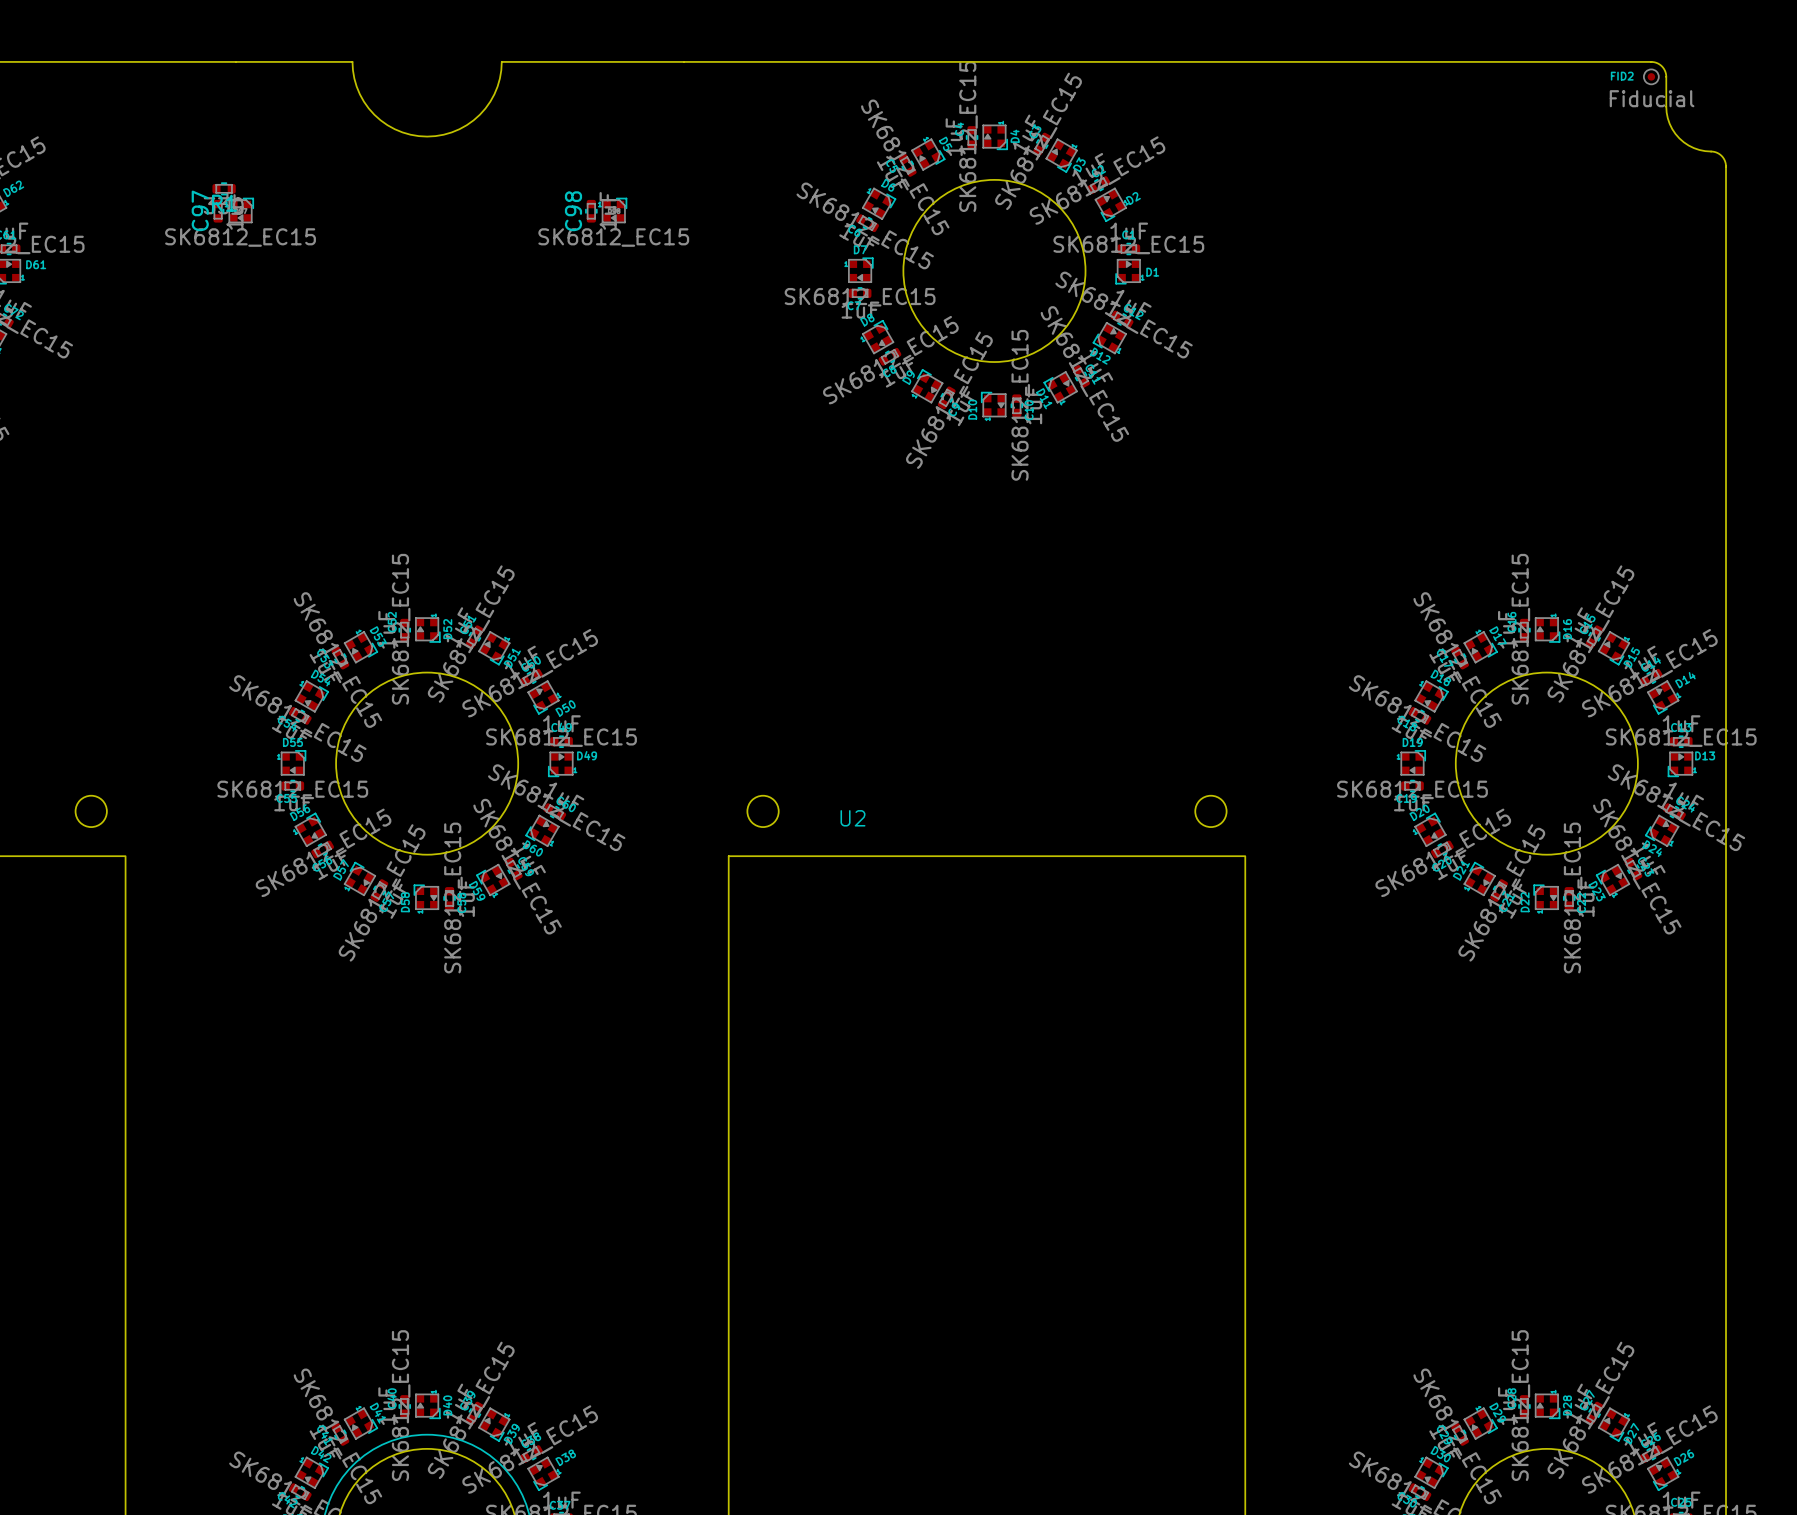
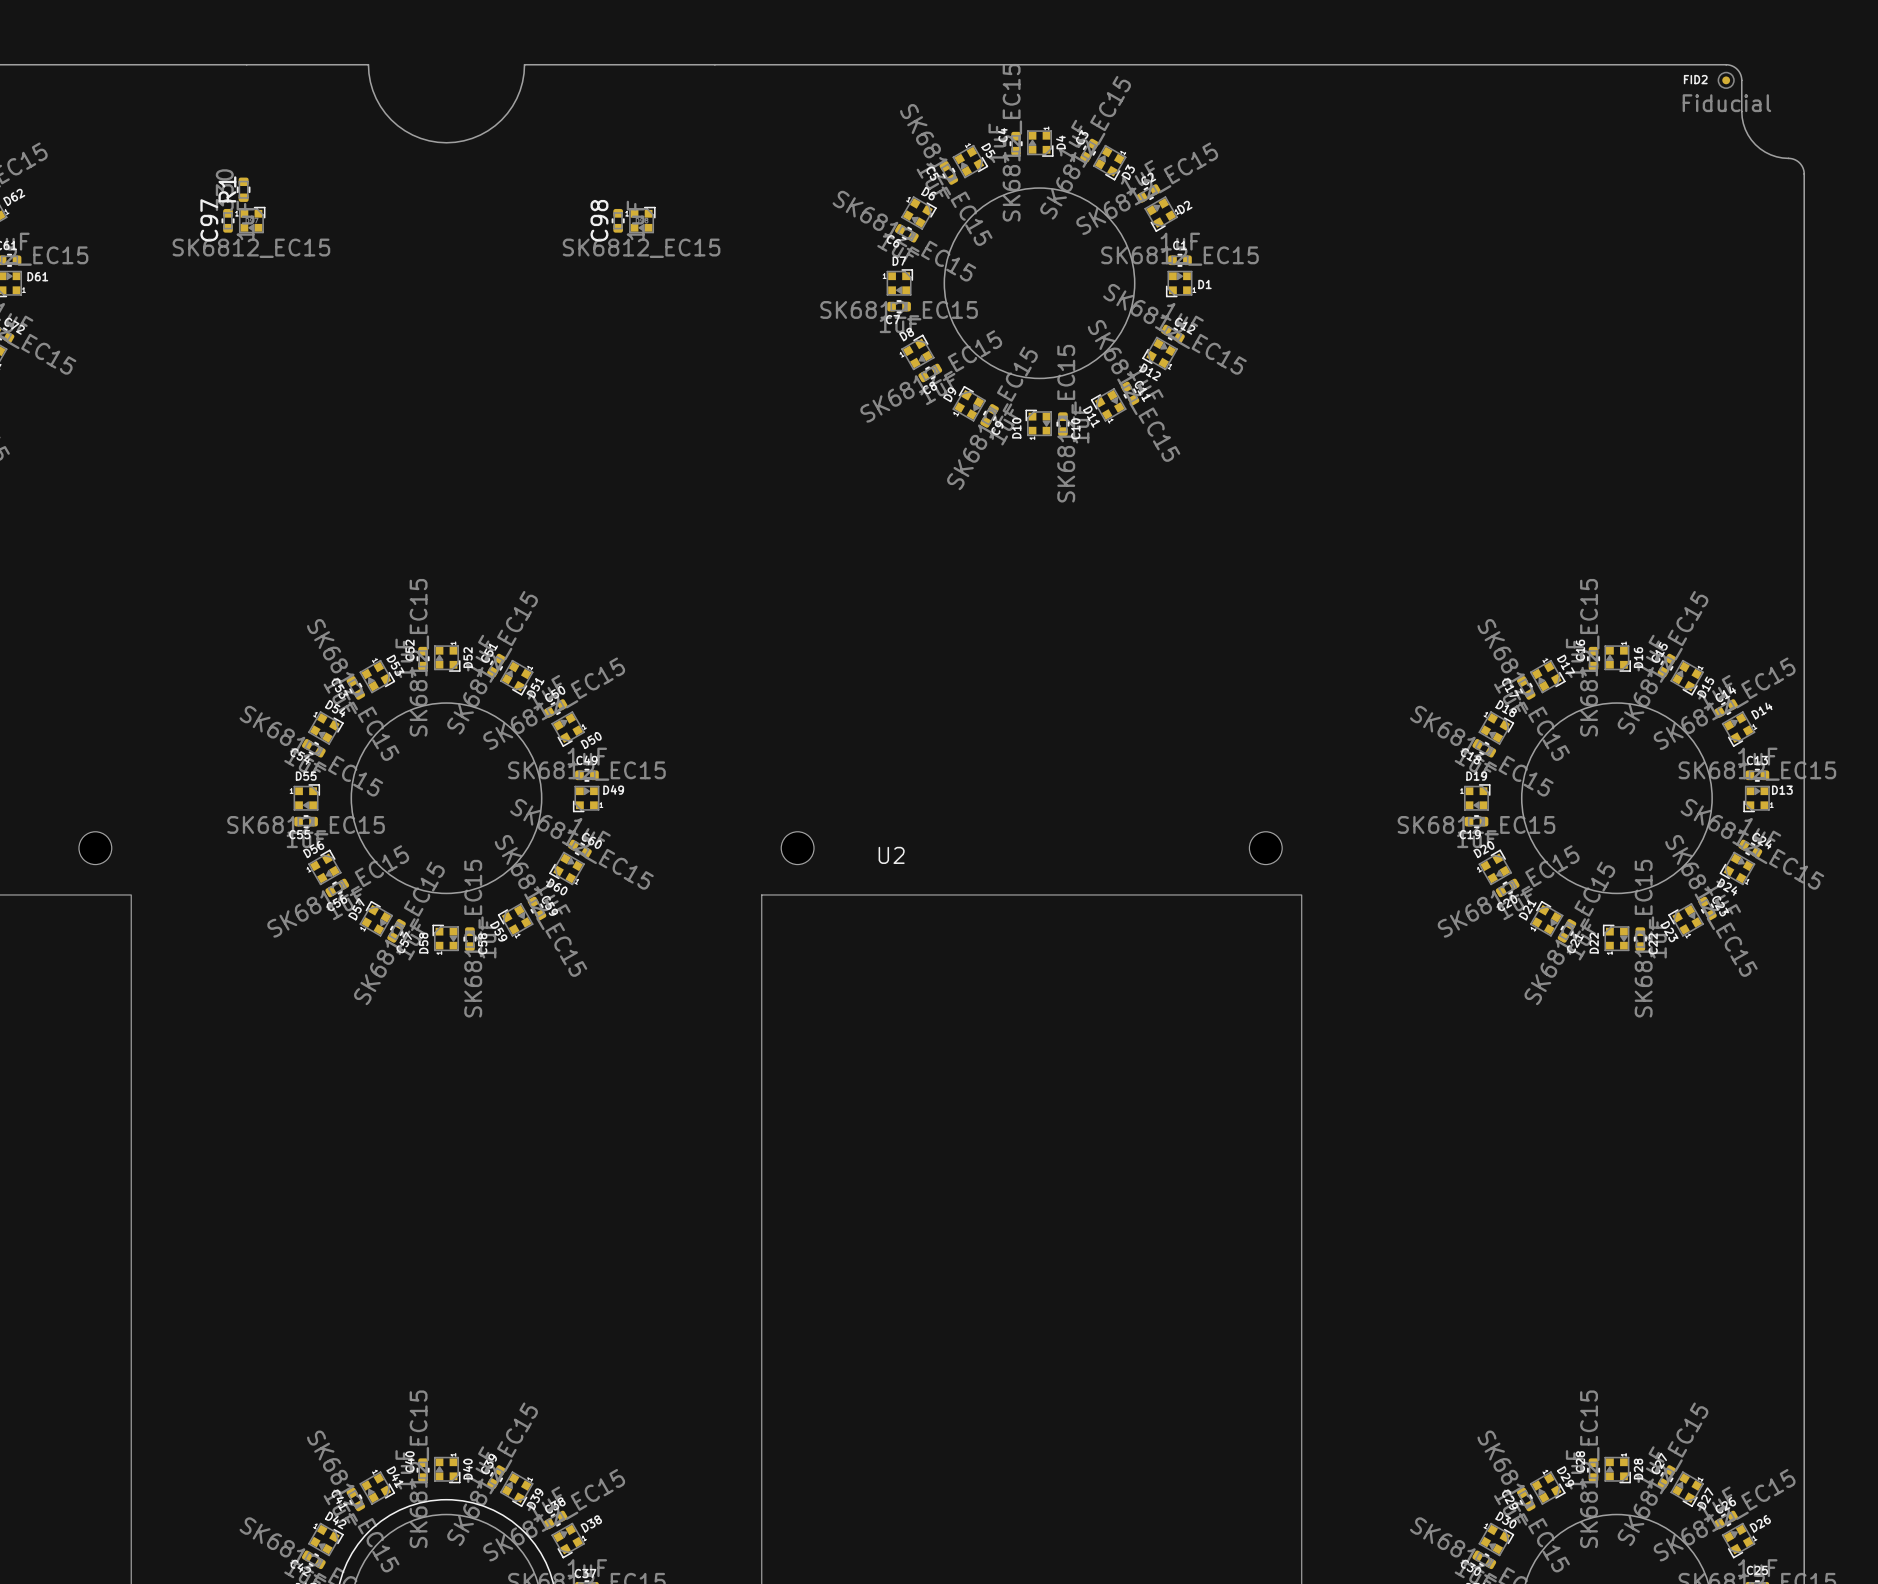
R1 rotation: 0° (224, 188) -> 90° clockwise (243, 189)

